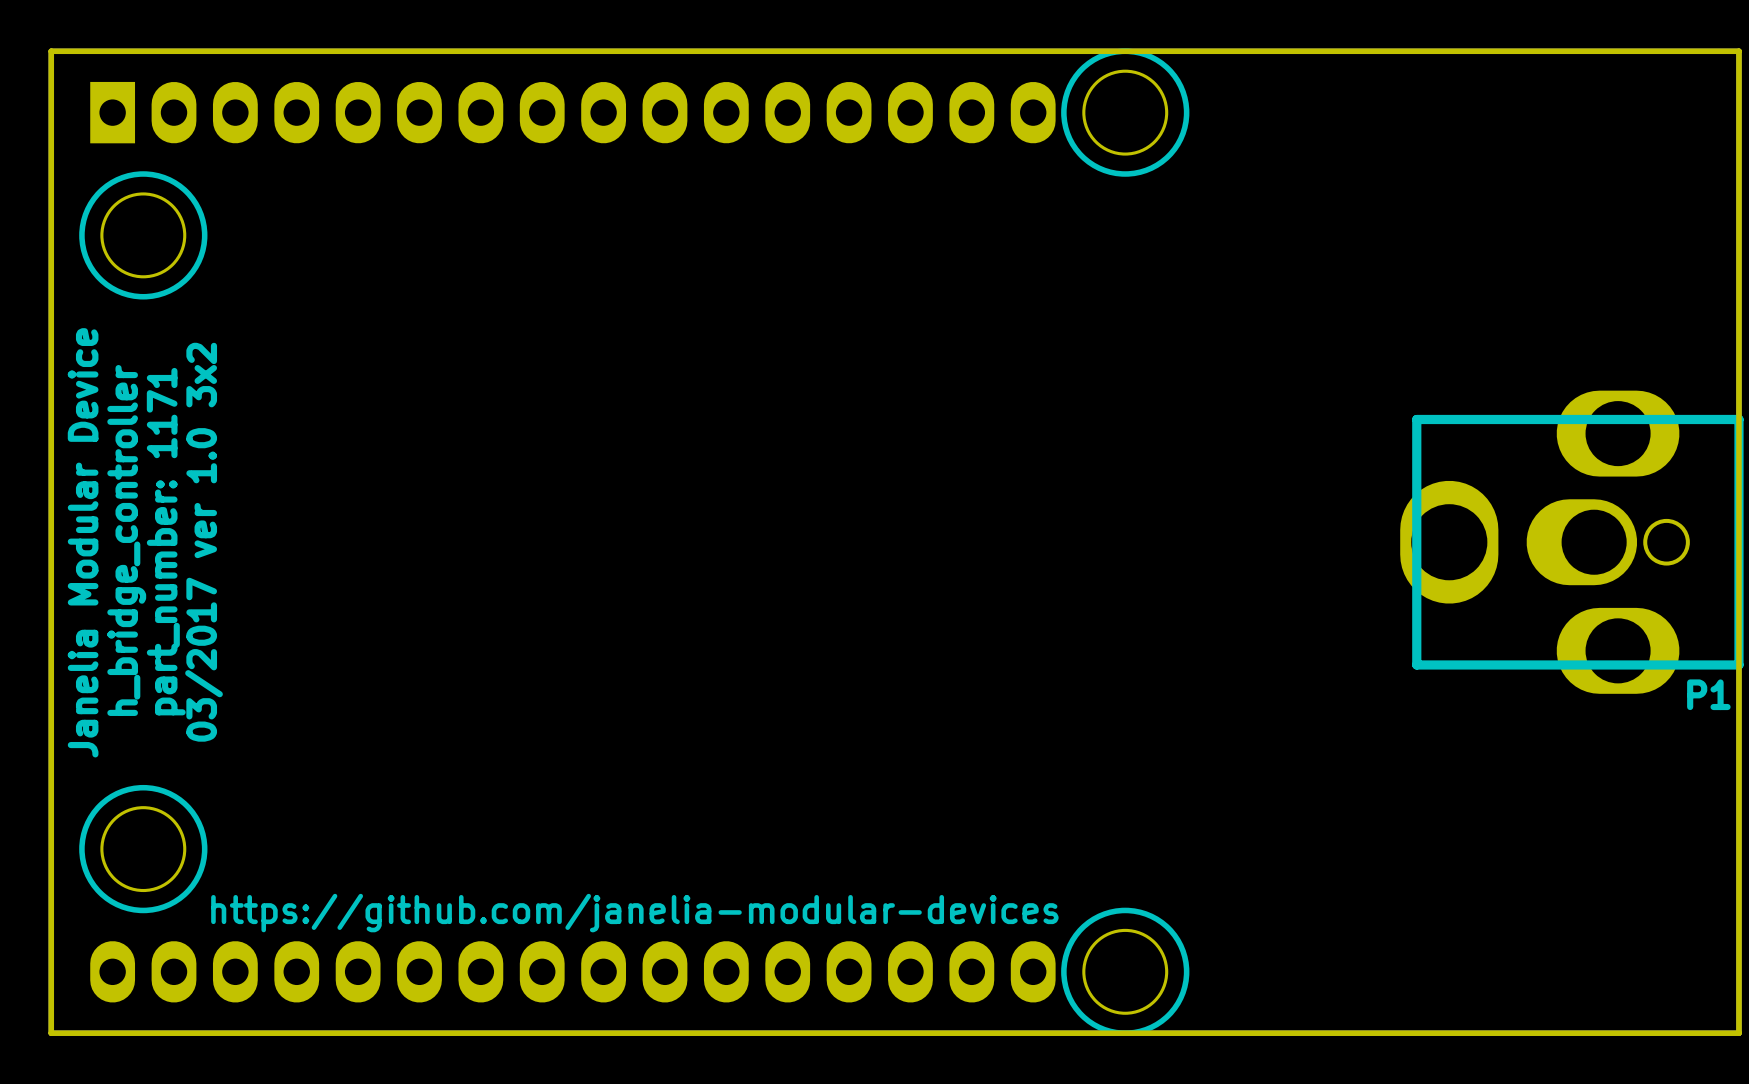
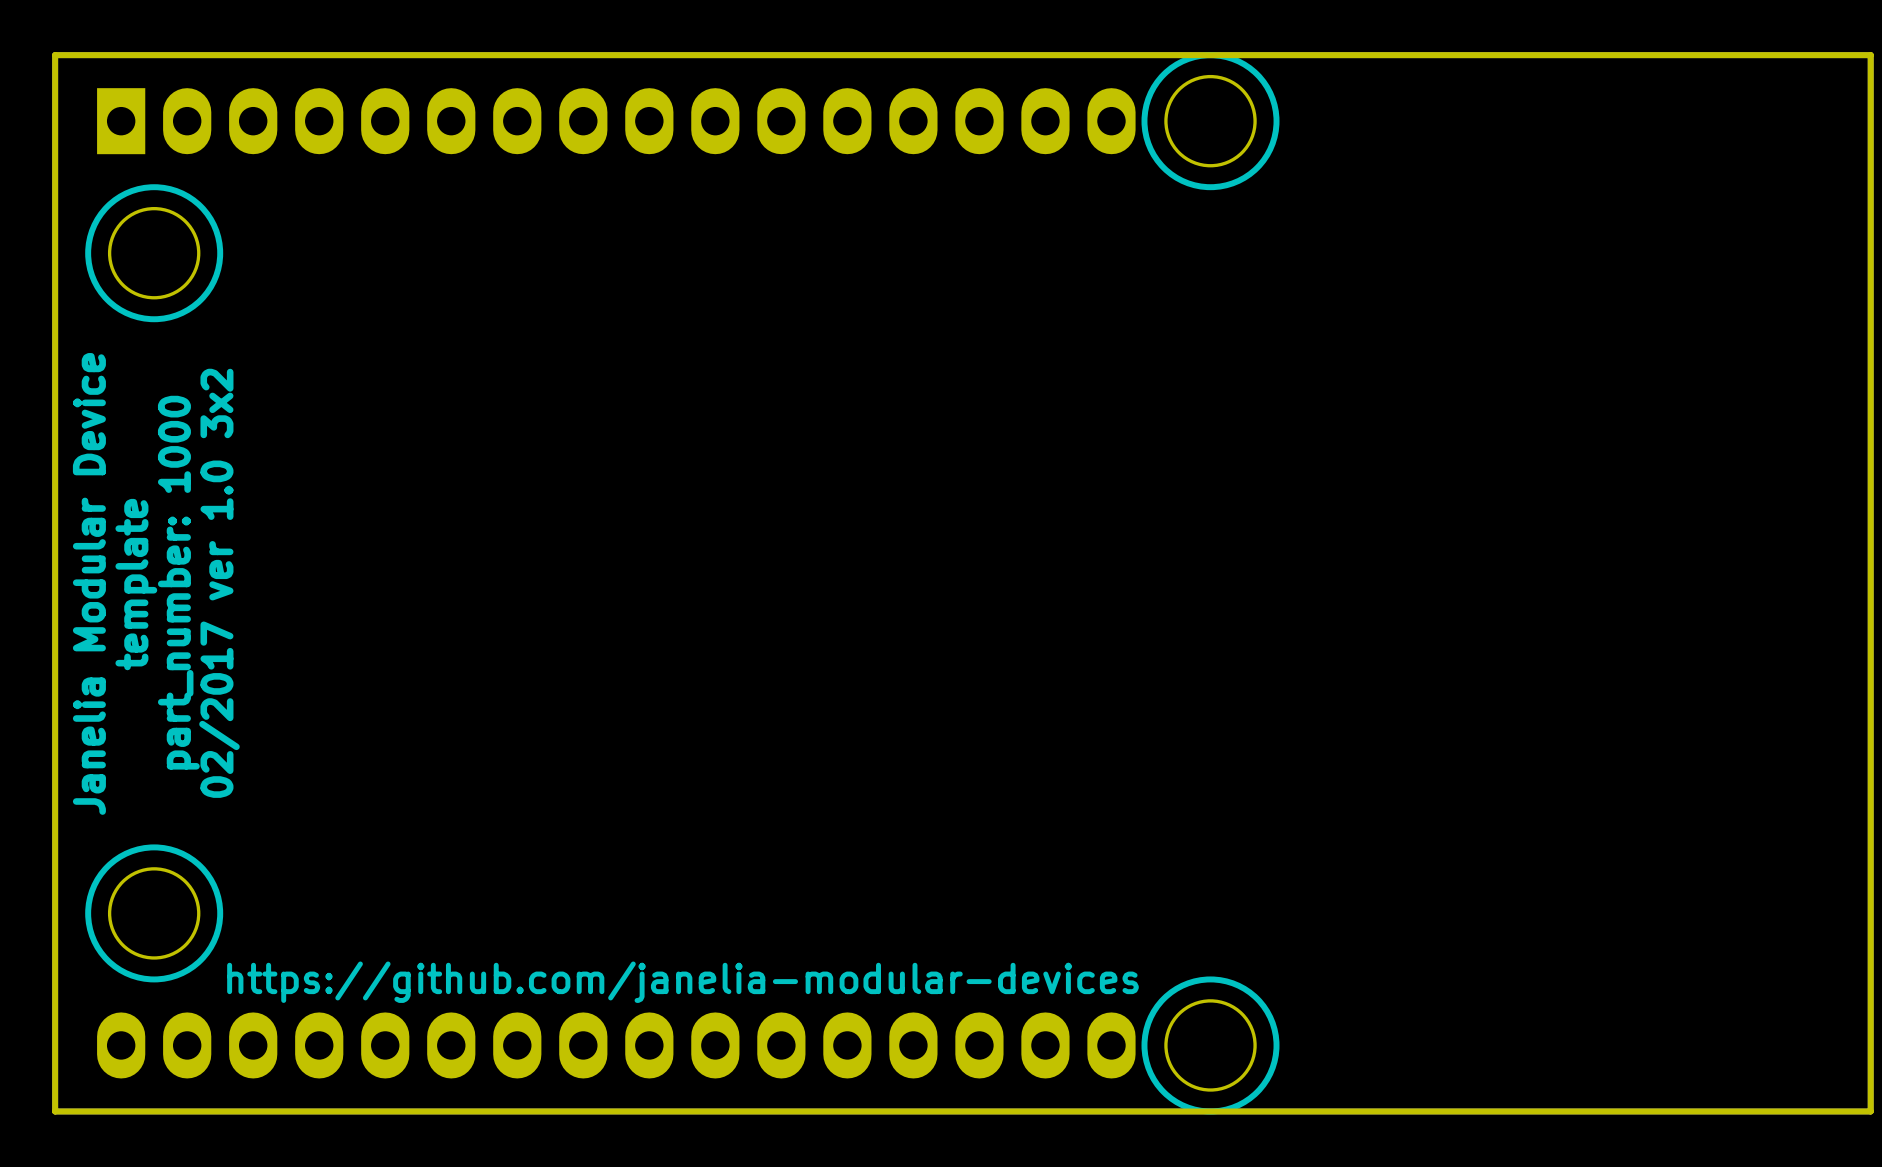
text: h_bridge_controller (126, 540) -> template (136, 584)
text: part_number: 1171 (166, 541) -> part_number: 1000 (178, 582)
text: 03/2017 ver 1.0 3x2 (204, 542) -> 02/2017 ver 1.0 3x2 (219, 583)
P1: (1571, 542) -> none

